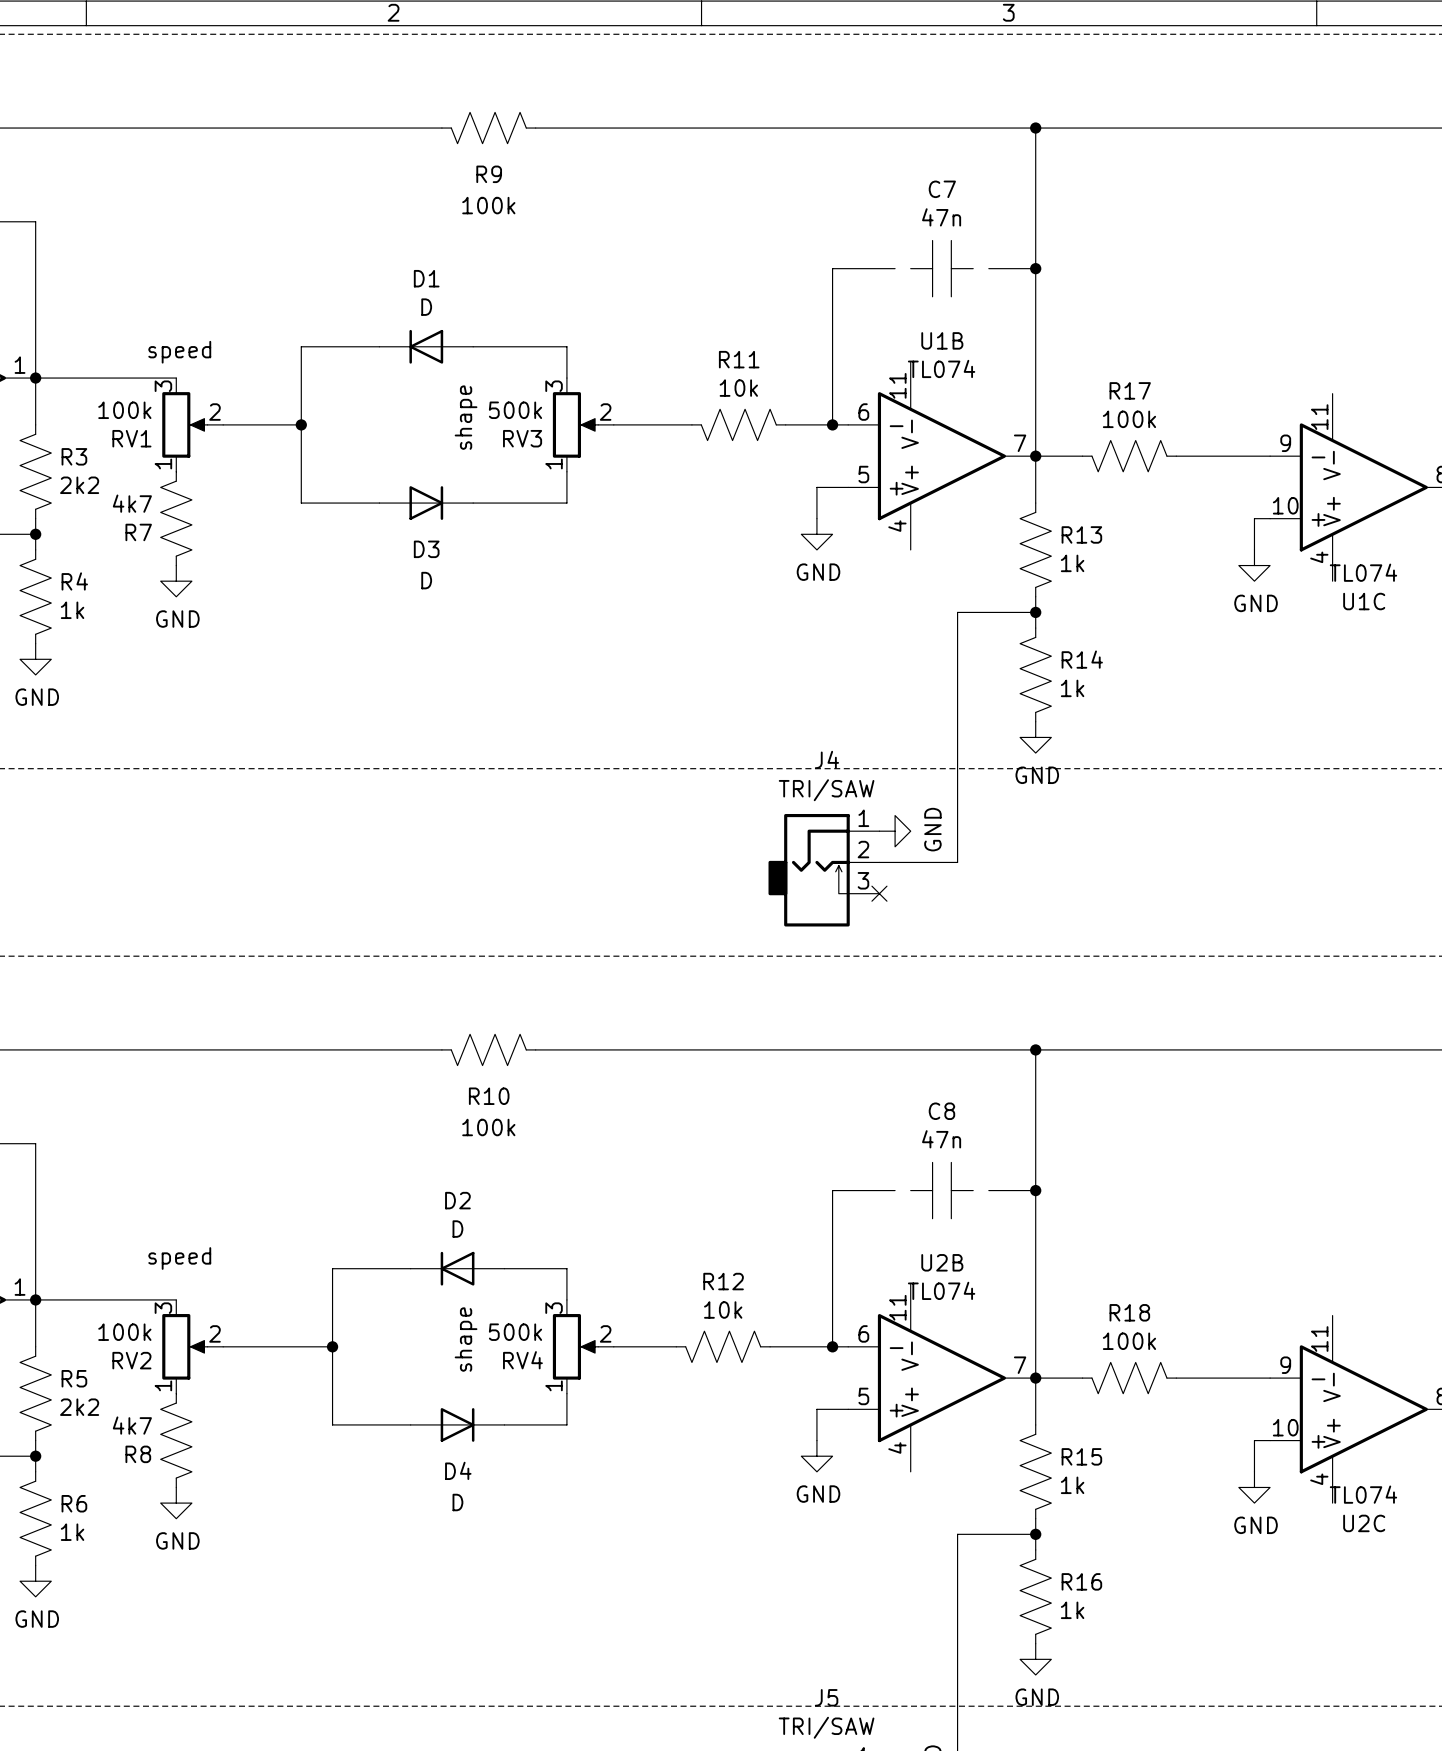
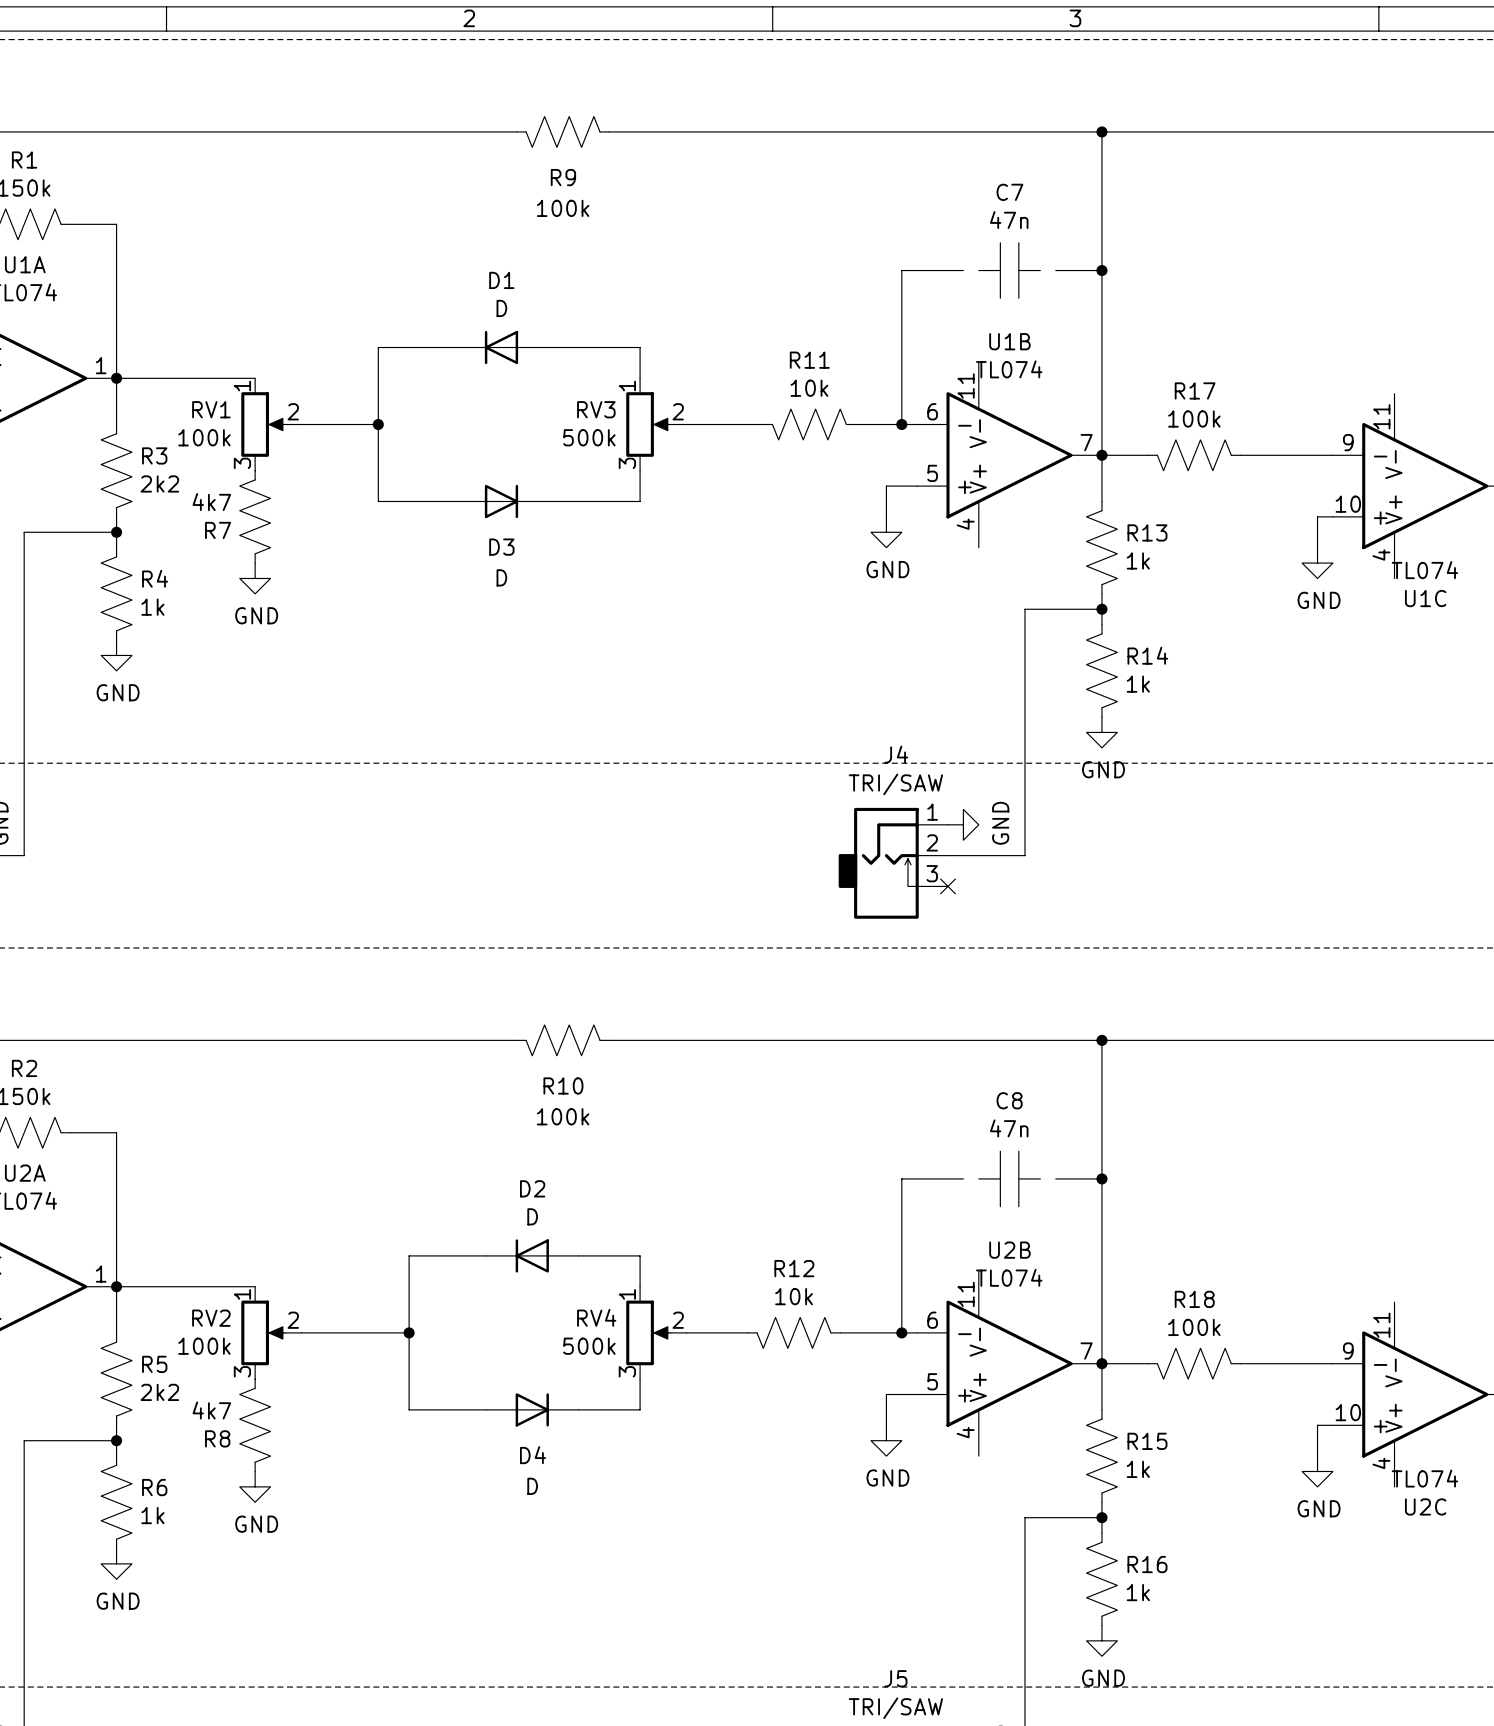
text: speed (179, 352) -> none
text: shape (466, 417) -> none
RV1 flip: as is (184, 424) -> up-down (263, 424)
RV3 flip: as is (575, 424) -> up-down (648, 424)
text: speed (179, 1258) -> none
text: shape (466, 1339) -> none
RV2 flip: as is (184, 1346) -> up-down (263, 1332)
RV4 flip: as is (575, 1346) -> up-down (648, 1332)

